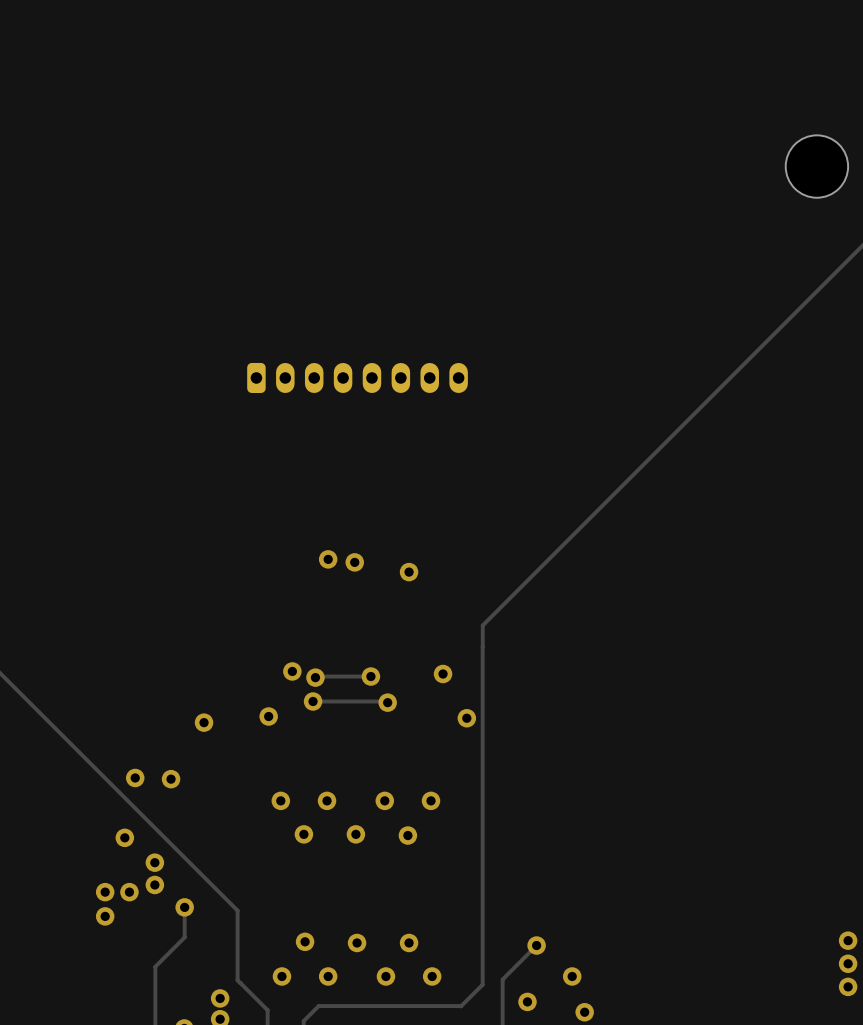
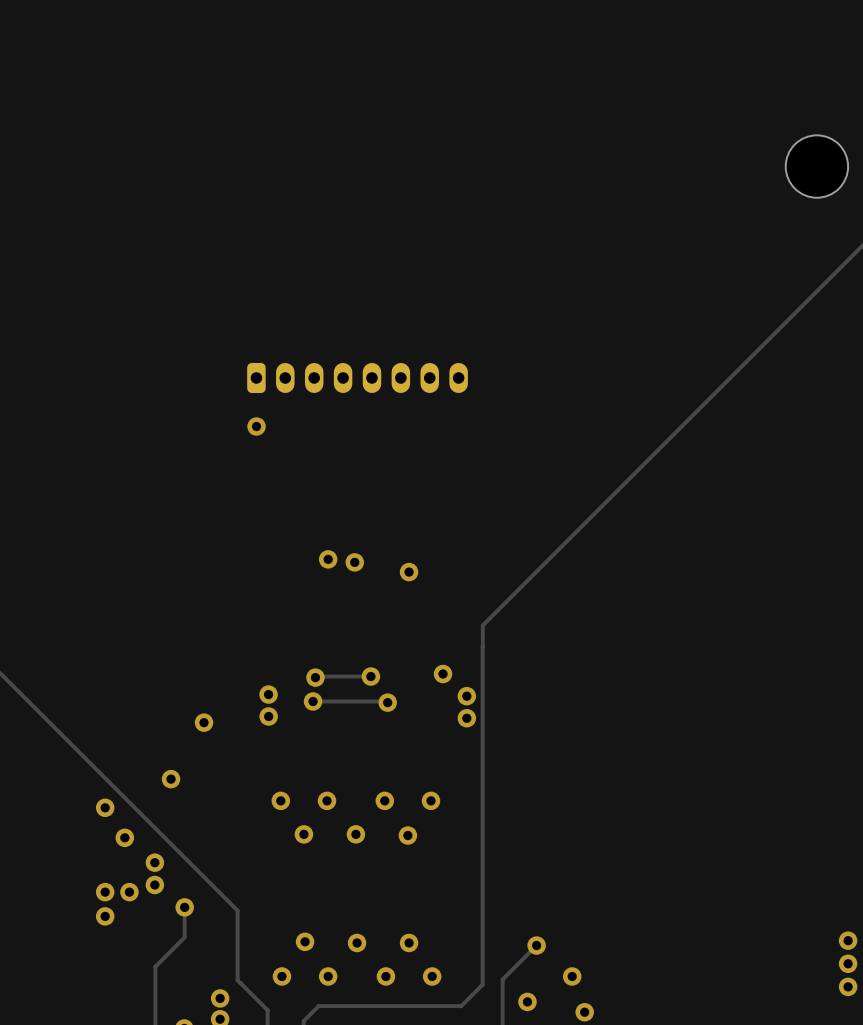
via: none -> (256, 426)
via position: (292, 671) -> (268, 694)
via: none -> (466, 696)
via position: (135, 777) -> (105, 807)

